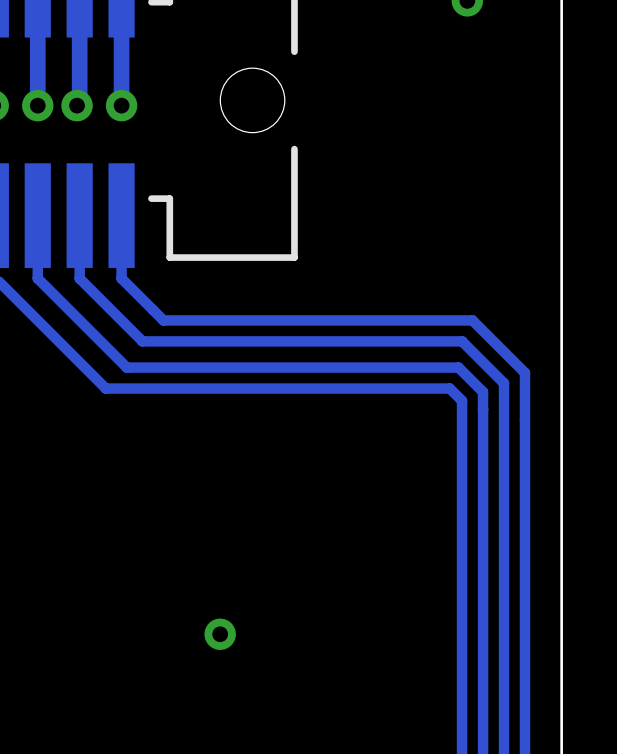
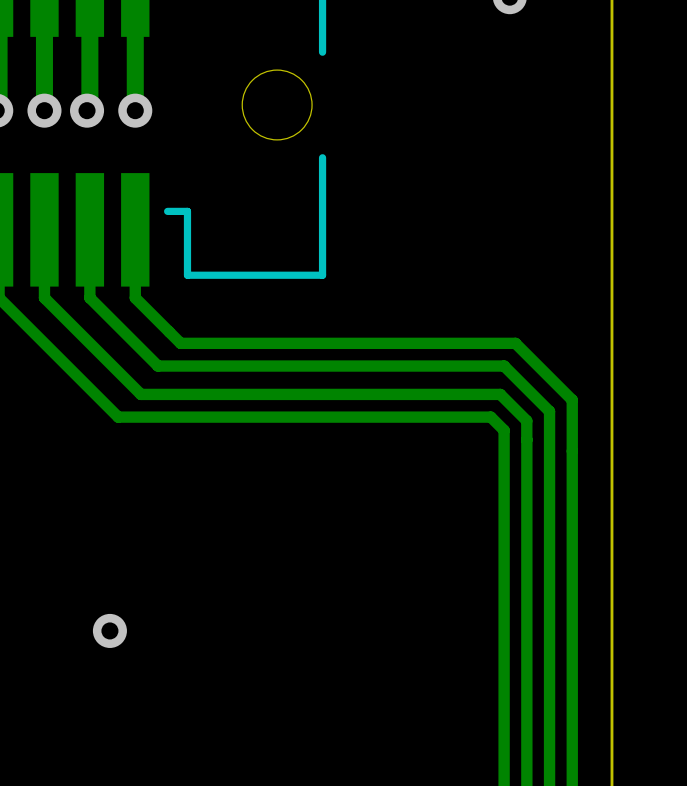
via position: (220, 634) -> (109, 630)

